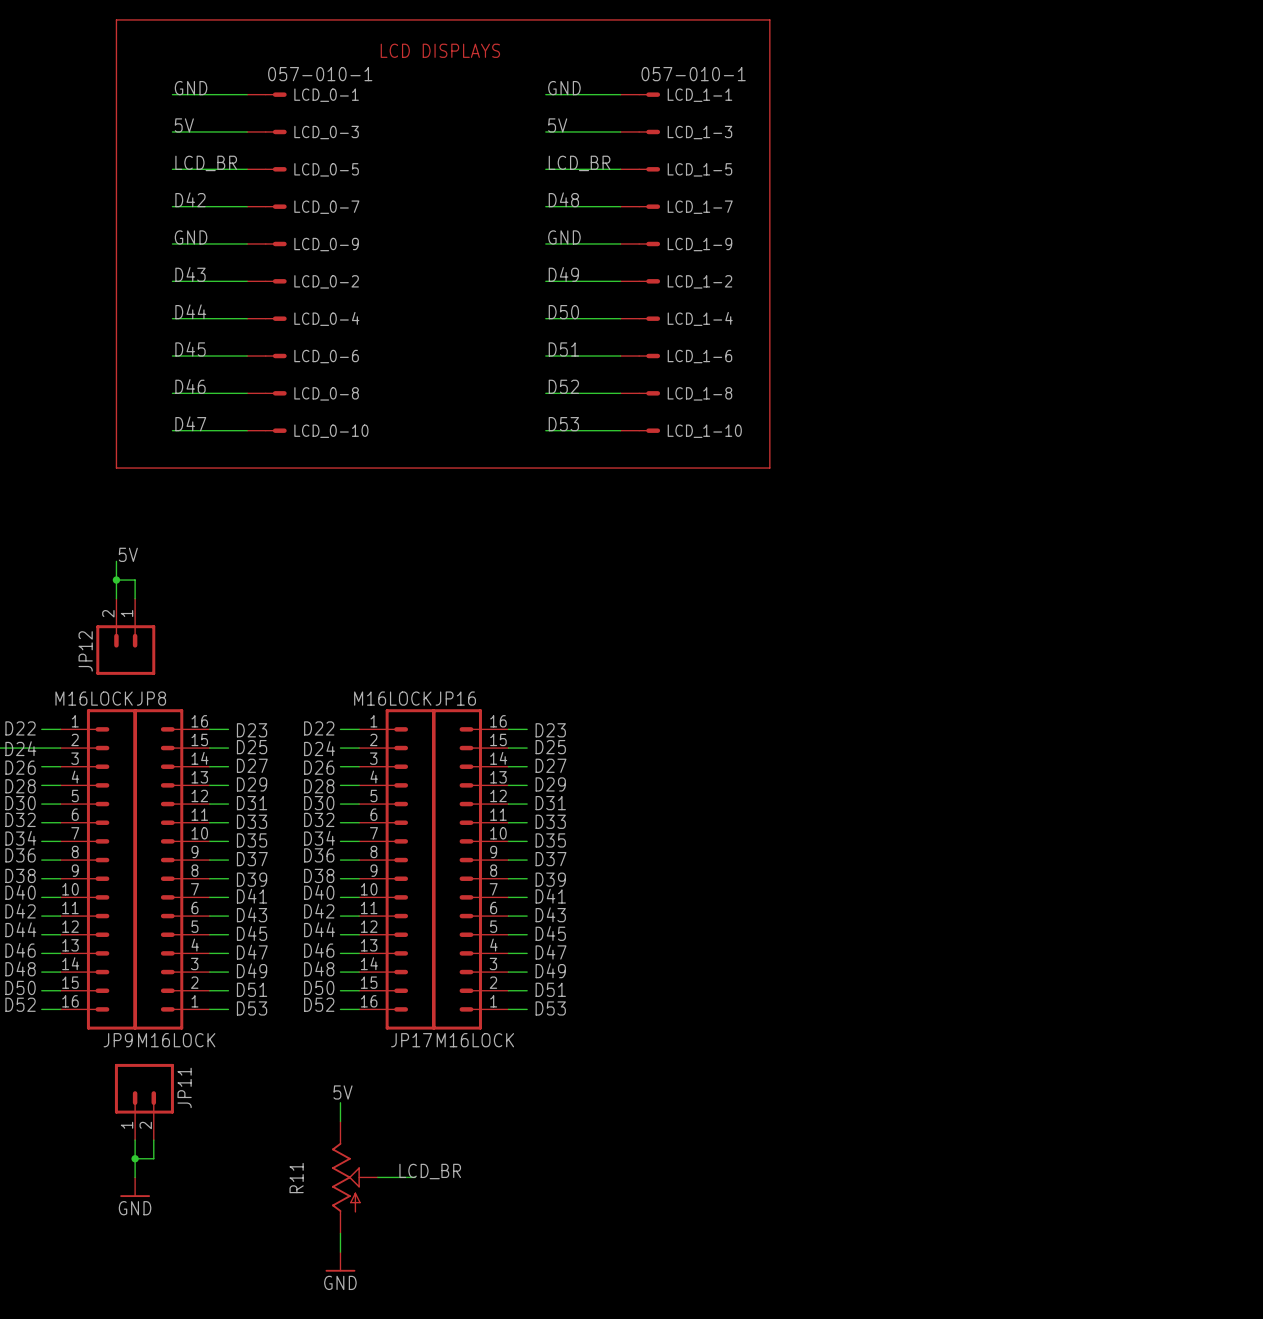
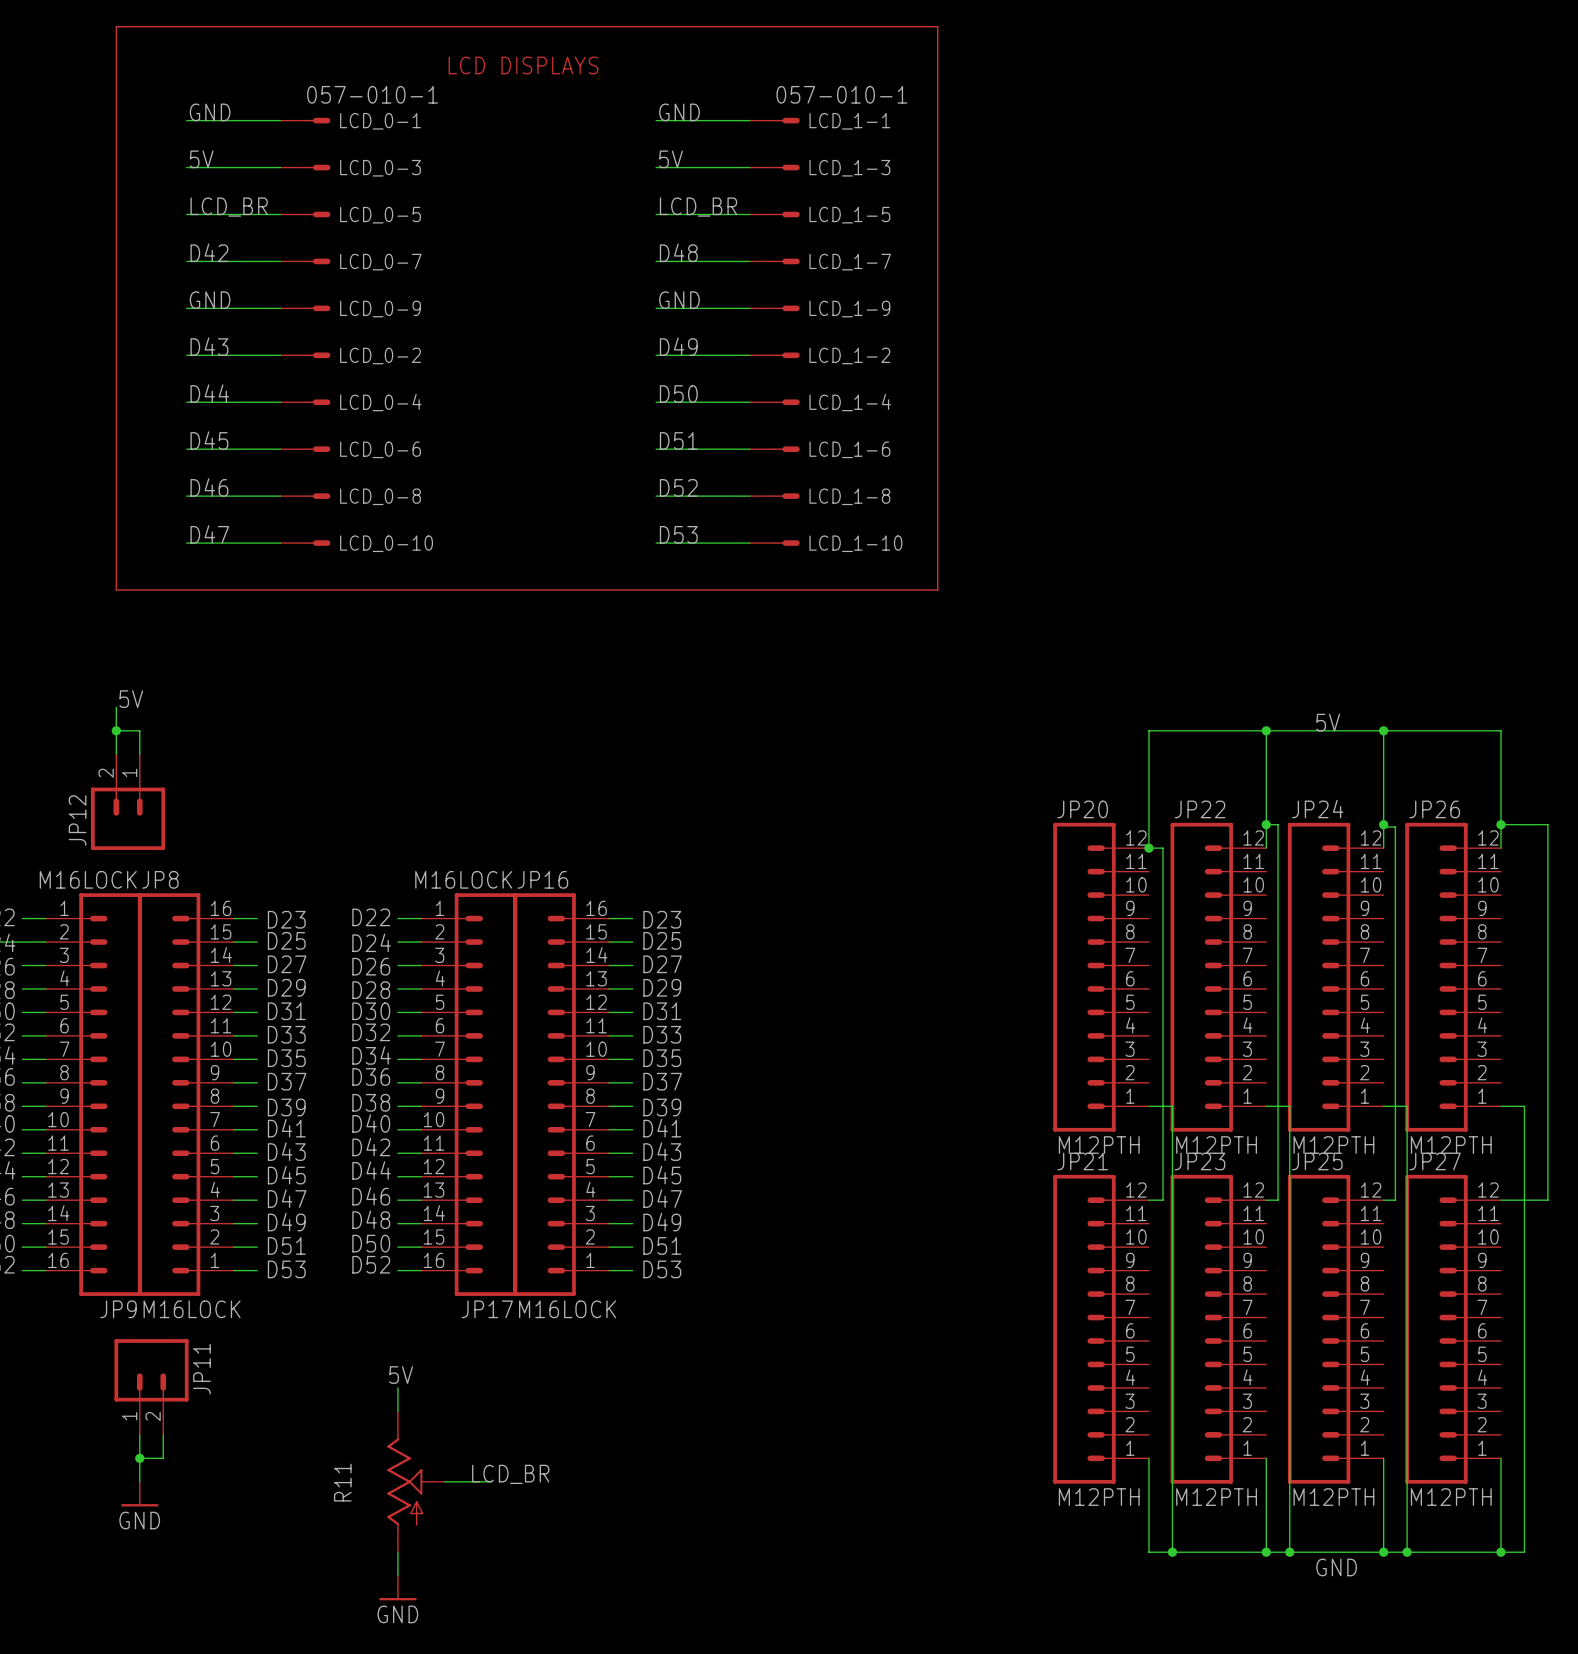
label: none -> 5V (1328, 722)
wire: none -> (1266, 730) (1266, 848)
junction: none -> (1266, 730)
wire: none -> (1383, 730) (1383, 848)
junction: none -> (1383, 730)
wire: none -> (1266, 824) (1278, 824) (1278, 1200) (1266, 1200)
junction: none -> (1266, 824)
junction: none -> (1383, 824)
wire: none -> (1500, 824) (1547, 824) (1547, 1200) (1500, 1200)
junction: none -> (1500, 824)
wire: none -> (1383, 827) (1395, 827) (1395, 1200) (1383, 1200)
junction: none -> (1148, 848)
wire: none -> (1500, 848) (1500, 730) (1148, 730) (1148, 848) (1163, 848) (1163, 1200) (1148, 1200)
JP20: none -> M12PTH (1101, 977)
JP22: none -> M12PTH (1218, 977)
JP24: none -> M12PTH (1335, 977)
JP26: none -> M12PTH (1453, 977)
wire: none -> (1148, 1106) (1172, 1106) (1172, 1552)
wire: none -> (1266, 1106) (1289, 1106) (1289, 1552)
wire: none -> (1383, 1106) (1407, 1106) (1407, 1552)
wire: none -> (1500, 1106) (1524, 1106) (1524, 1552) (1148, 1552) (1148, 1458)
JP21: none -> M12PTH (1101, 1329)
JP23: none -> M12PTH (1218, 1329)
JP25: none -> M12PTH (1335, 1329)
JP27: none -> M12PTH (1453, 1329)
wire: none -> (1266, 1458) (1266, 1552)
wire: none -> (1383, 1458) (1383, 1552)
wire: none -> (1500, 1458) (1500, 1552)
junction: none -> (1172, 1552)
junction: none -> (1266, 1552)
junction: none -> (1289, 1552)
junction: none -> (1383, 1552)
junction: none -> (1407, 1552)
junction: none -> (1500, 1552)
label: none -> GND (1336, 1567)

